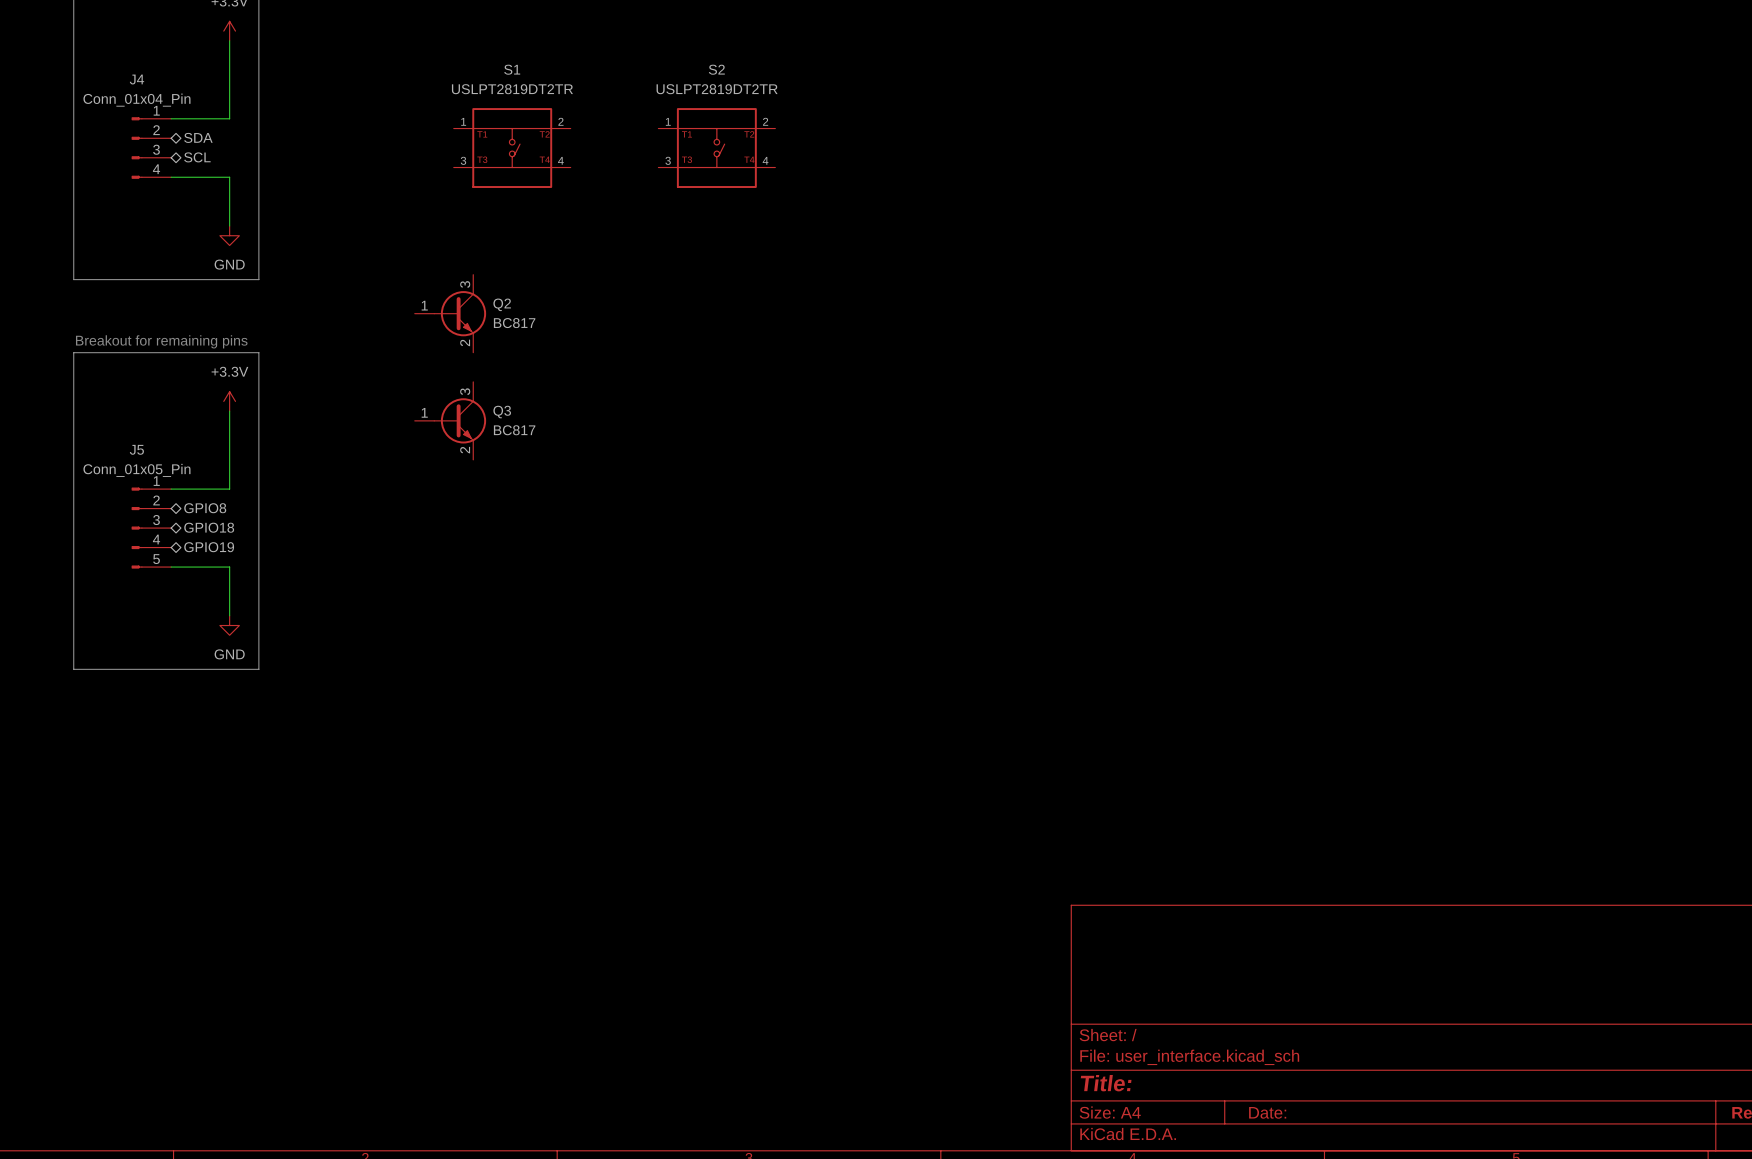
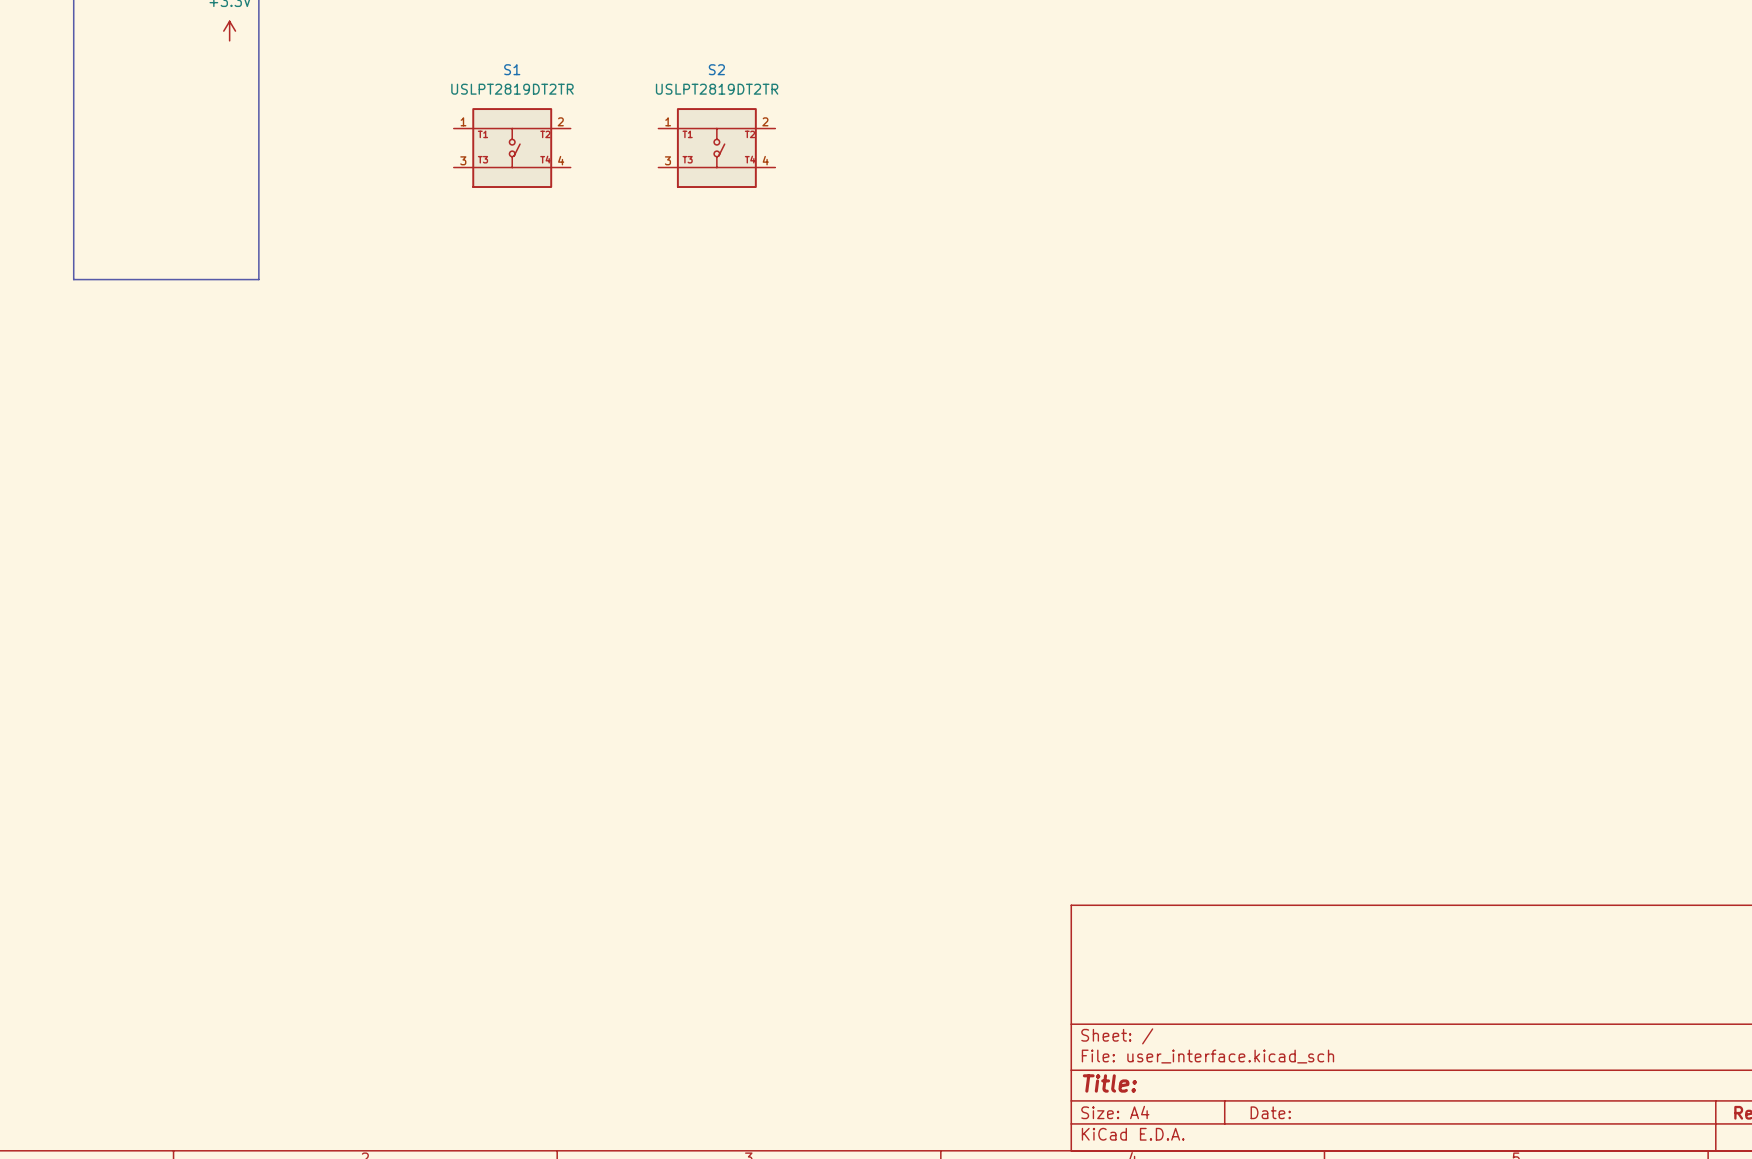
wire: (229, 40) (229, 118) (171, 118) -> none
hierarchical label: SDA (198, 137) -> none
J4: Conn_01x04_Pin (151, 148) -> none
hierarchical label: SCL (197, 157) -> none
wire: (171, 177) (229, 177) (229, 225) -> none
power symbol: GND (229, 235) -> none
Q2: BC817 (450, 313) -> none
text: Breakout for remaining pins (161, 341) -> none
line: (73, 352) (258, 352) (258, 669) (73, 669) (73, 352) -> none
power symbol: +3.3V (229, 401) -> none
wire: (229, 411) (229, 489) (171, 489) -> none
Q3: BC817 (450, 420) -> none
hierarchical label: GPIO8 (205, 508) -> none
hierarchical label: GPIO18 (209, 527) -> none
J5: Conn_01x05_Pin (151, 528) -> none
hierarchical label: GPIO19 (209, 547) -> none
wire: (171, 567) (229, 567) (229, 615) -> none
power symbol: GND (229, 625) -> none

